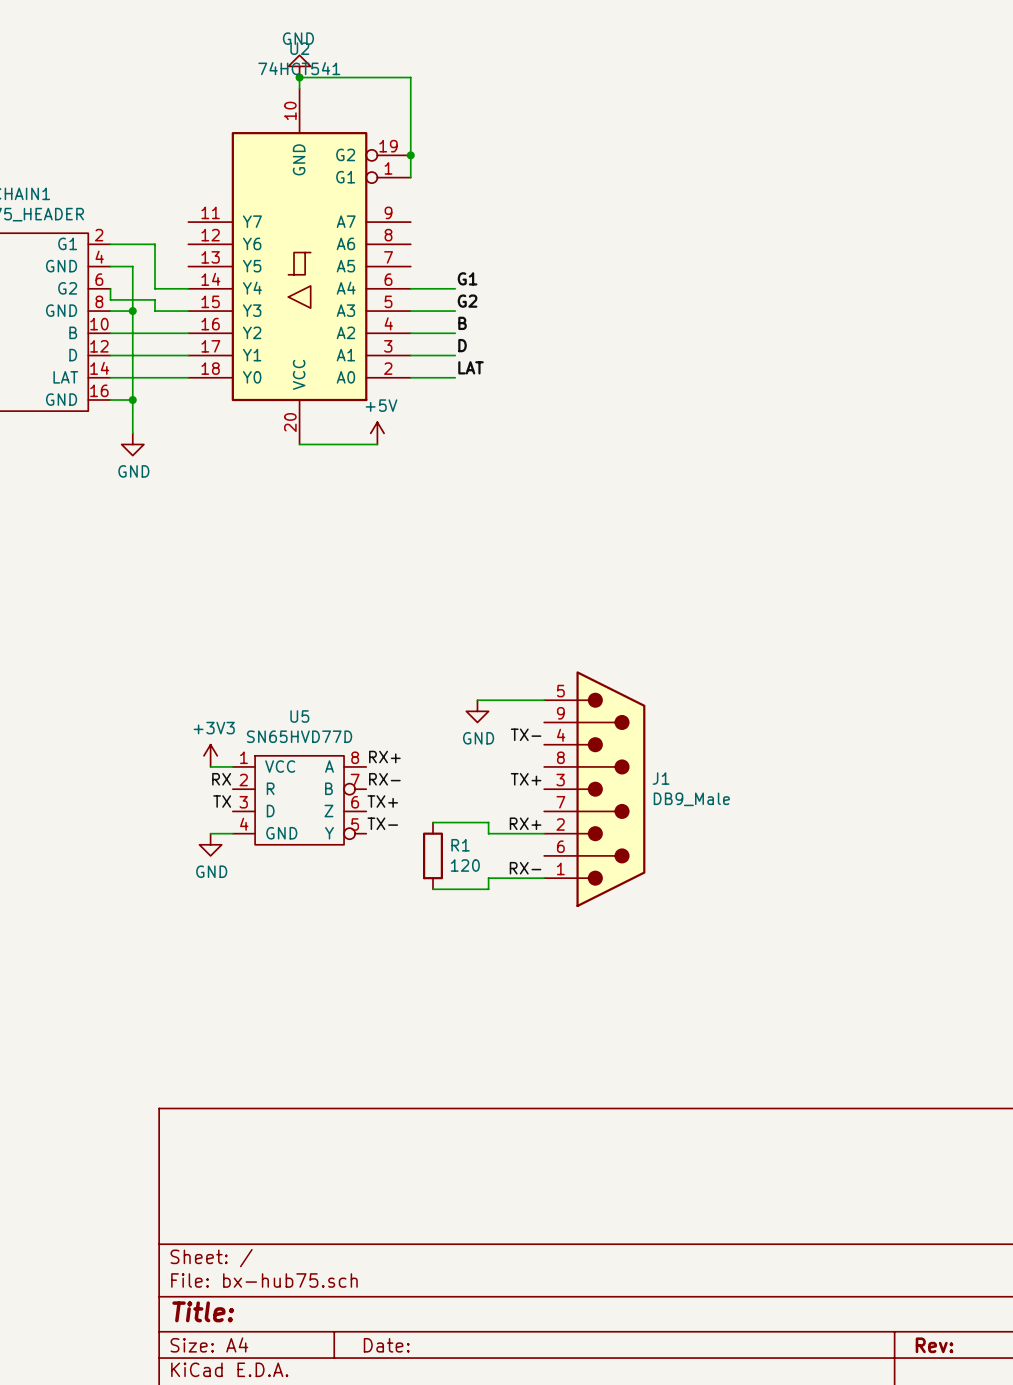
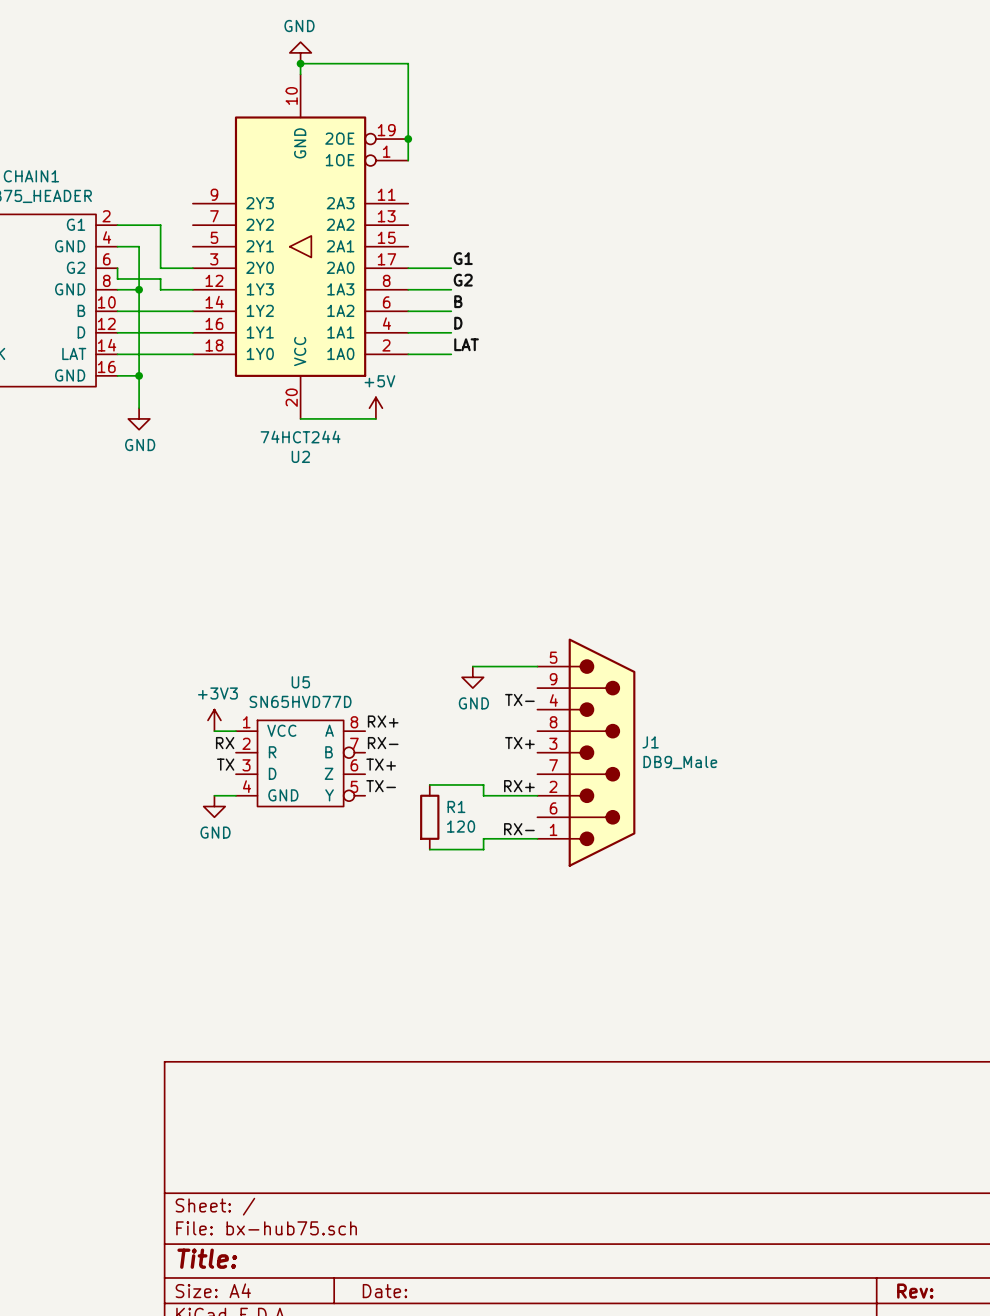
U2 name position: U2 (299, 48) -> U2 (300, 456)
U2 value: 74HCT541 (299, 68) -> 74HCT244 (300, 437)
U2 symbol: [188, 88, 411, 445] -> [192, 74, 409, 419]

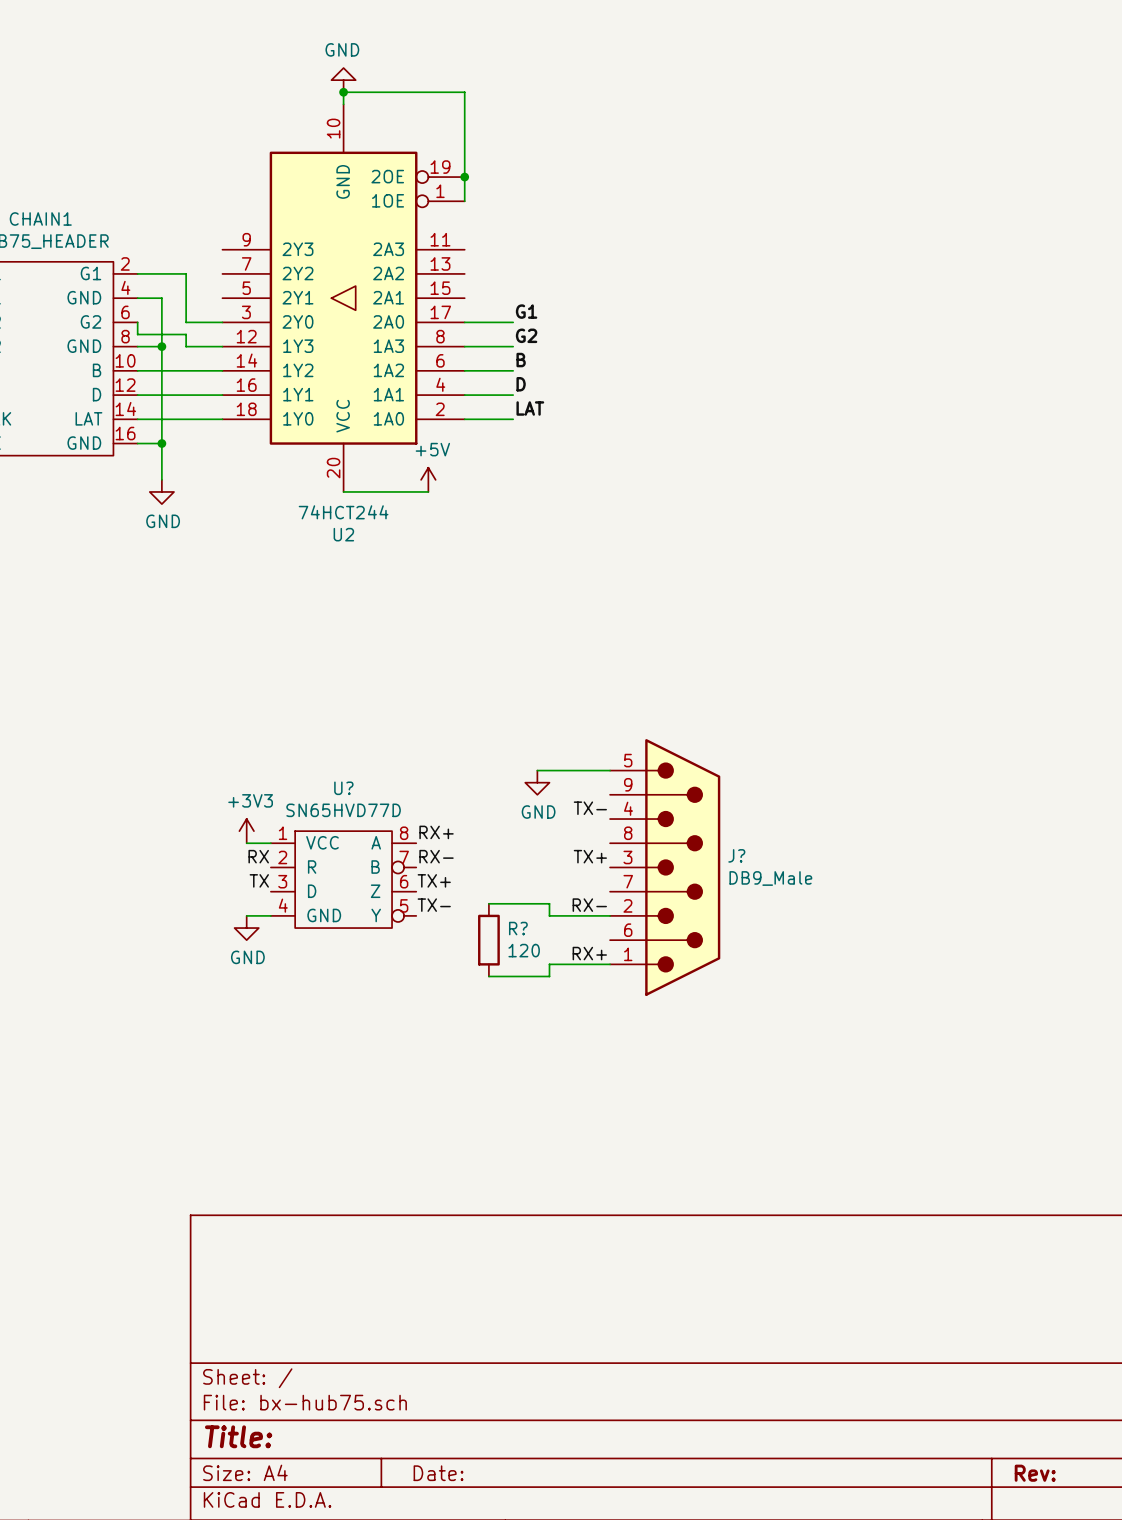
U5 name: U5 (300, 682) -> U? (343, 788)
J1 name: J1 (650, 742) -> J? (736, 855)
label: RX+ (519, 786) -> RX- (589, 905)
R1 name: R1 (456, 806) -> R? (518, 928)
label: RX- (519, 829) -> RX+ (589, 953)

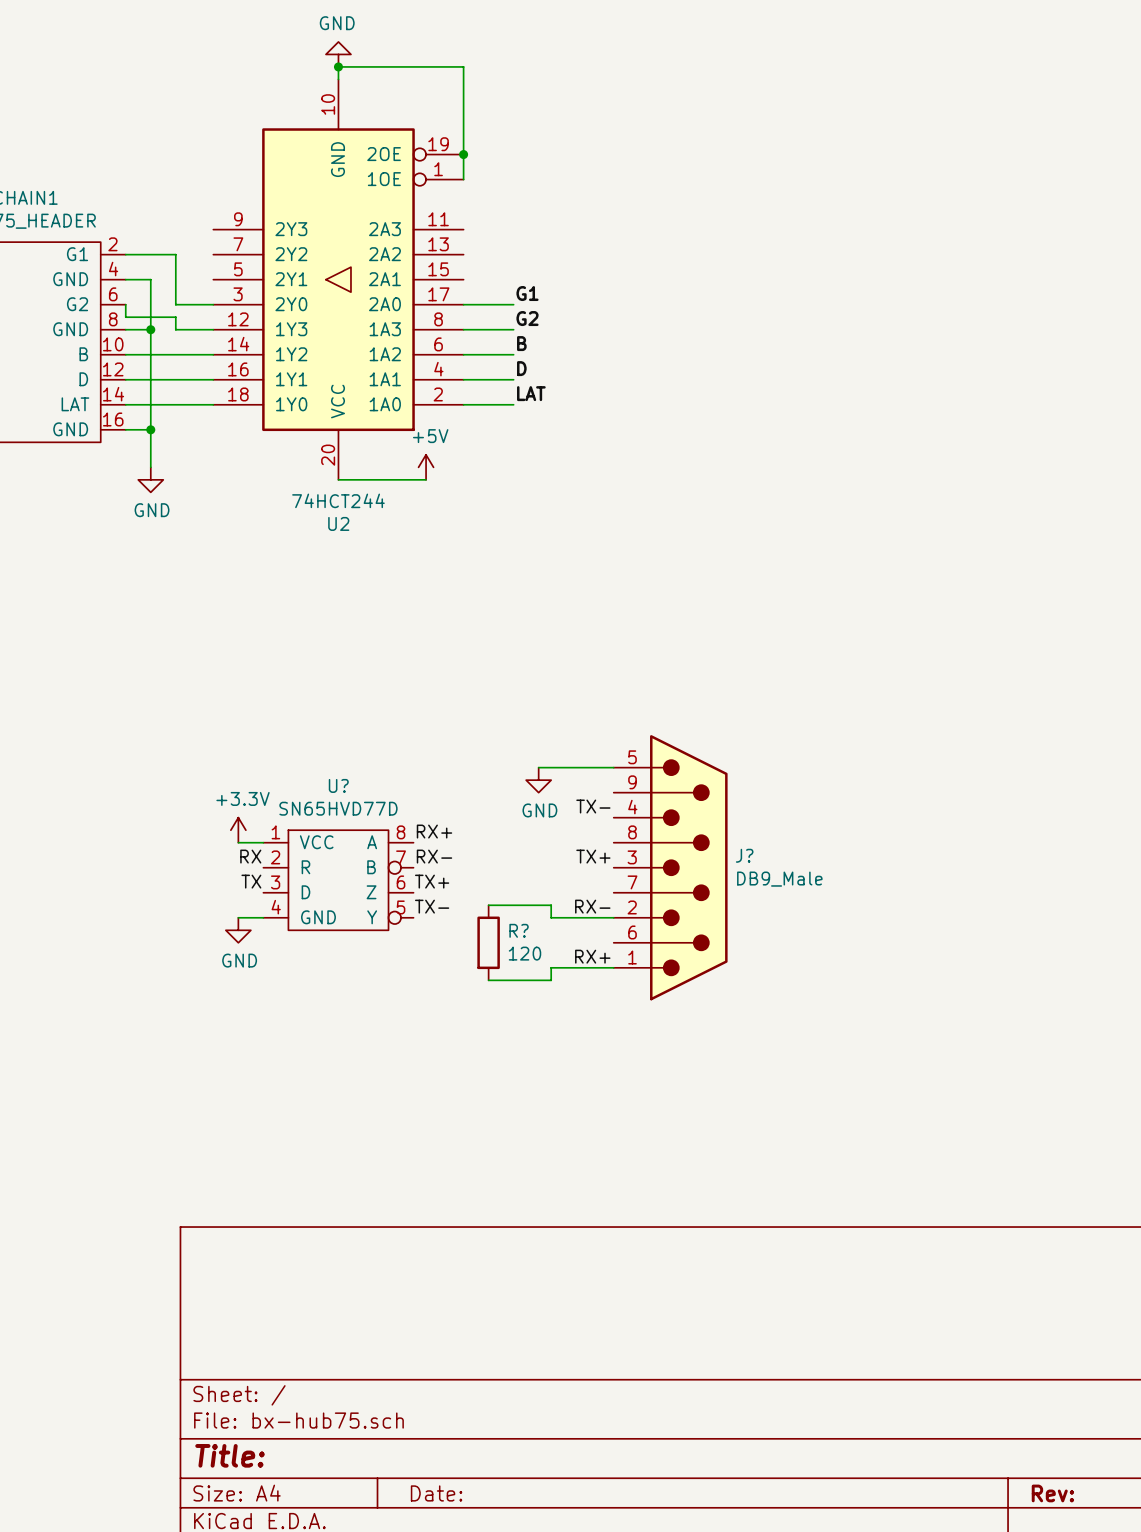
power symbol: +3V3 (246, 831) -> +3.3V (238, 830)

